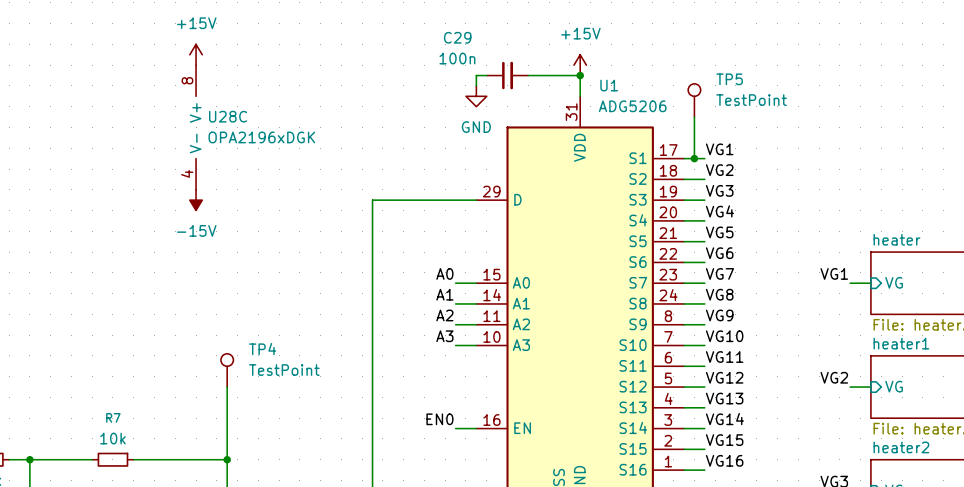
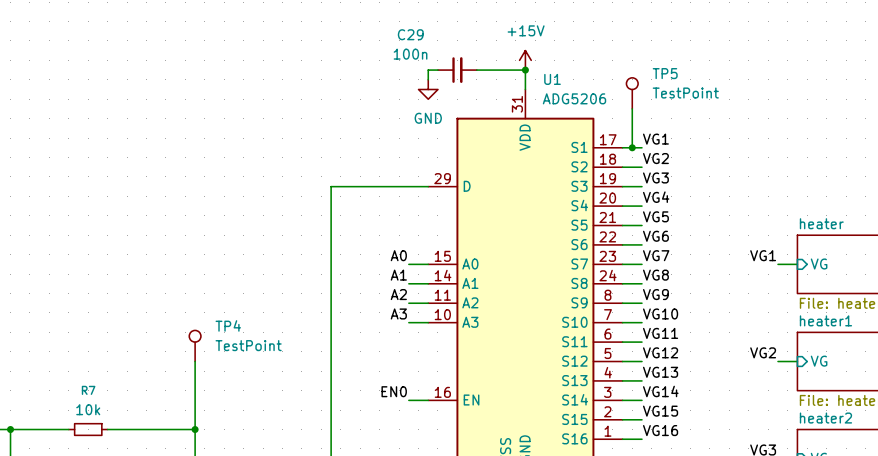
power symbol: +15V (196, 54) -> none
U28C: OPA2196xDGK (196, 127) -> none
power symbol: -15V (196, 200) -> none

